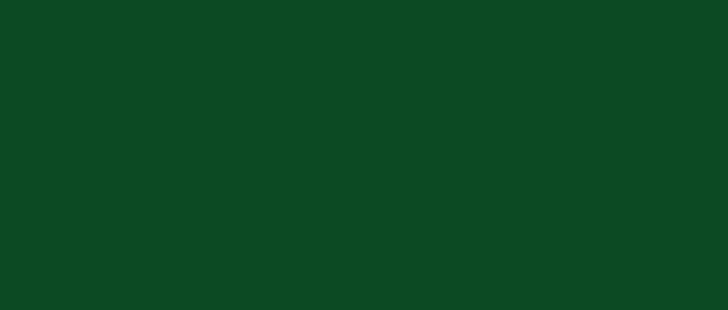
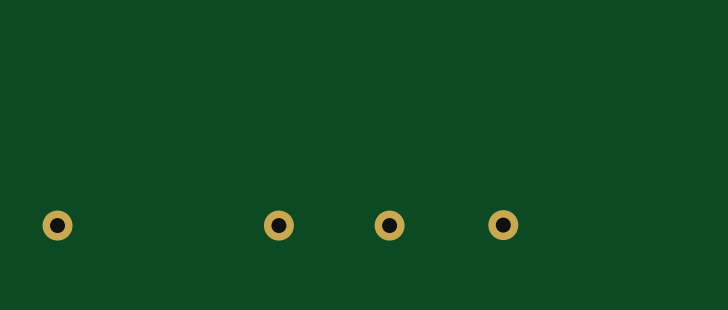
via: none -> (57, 225)
via: none -> (278, 225)
via: none -> (389, 225)
via: none -> (503, 225)

